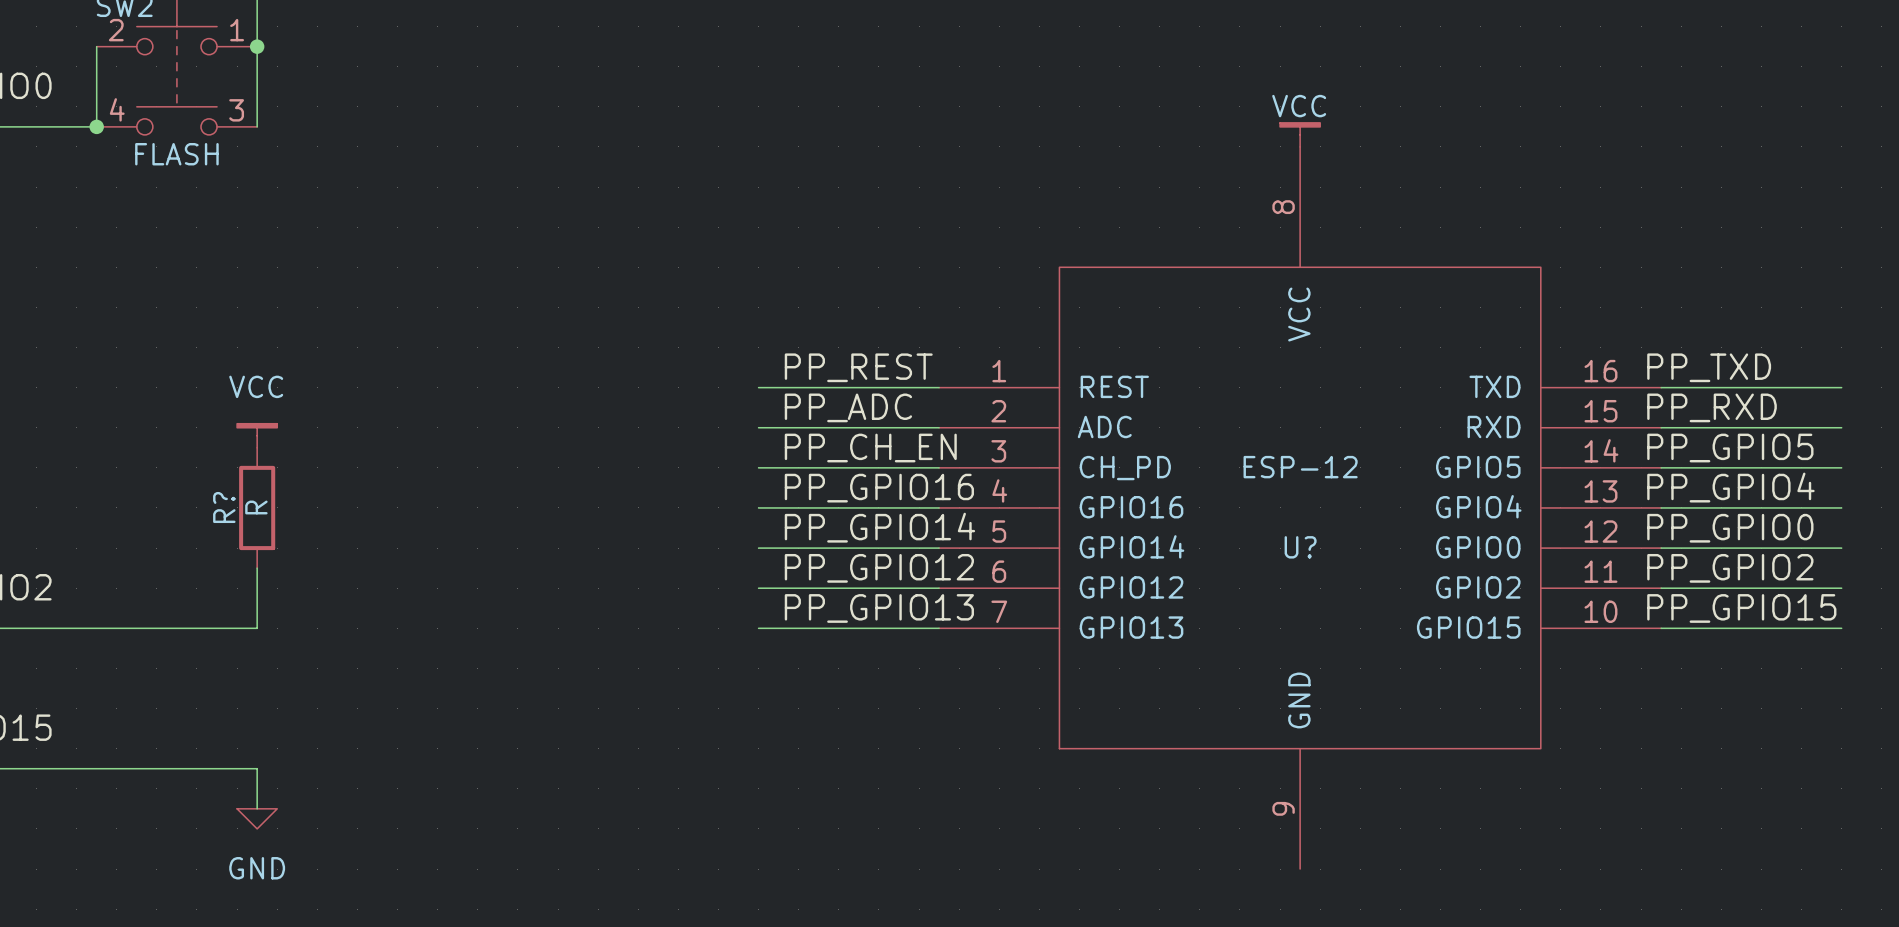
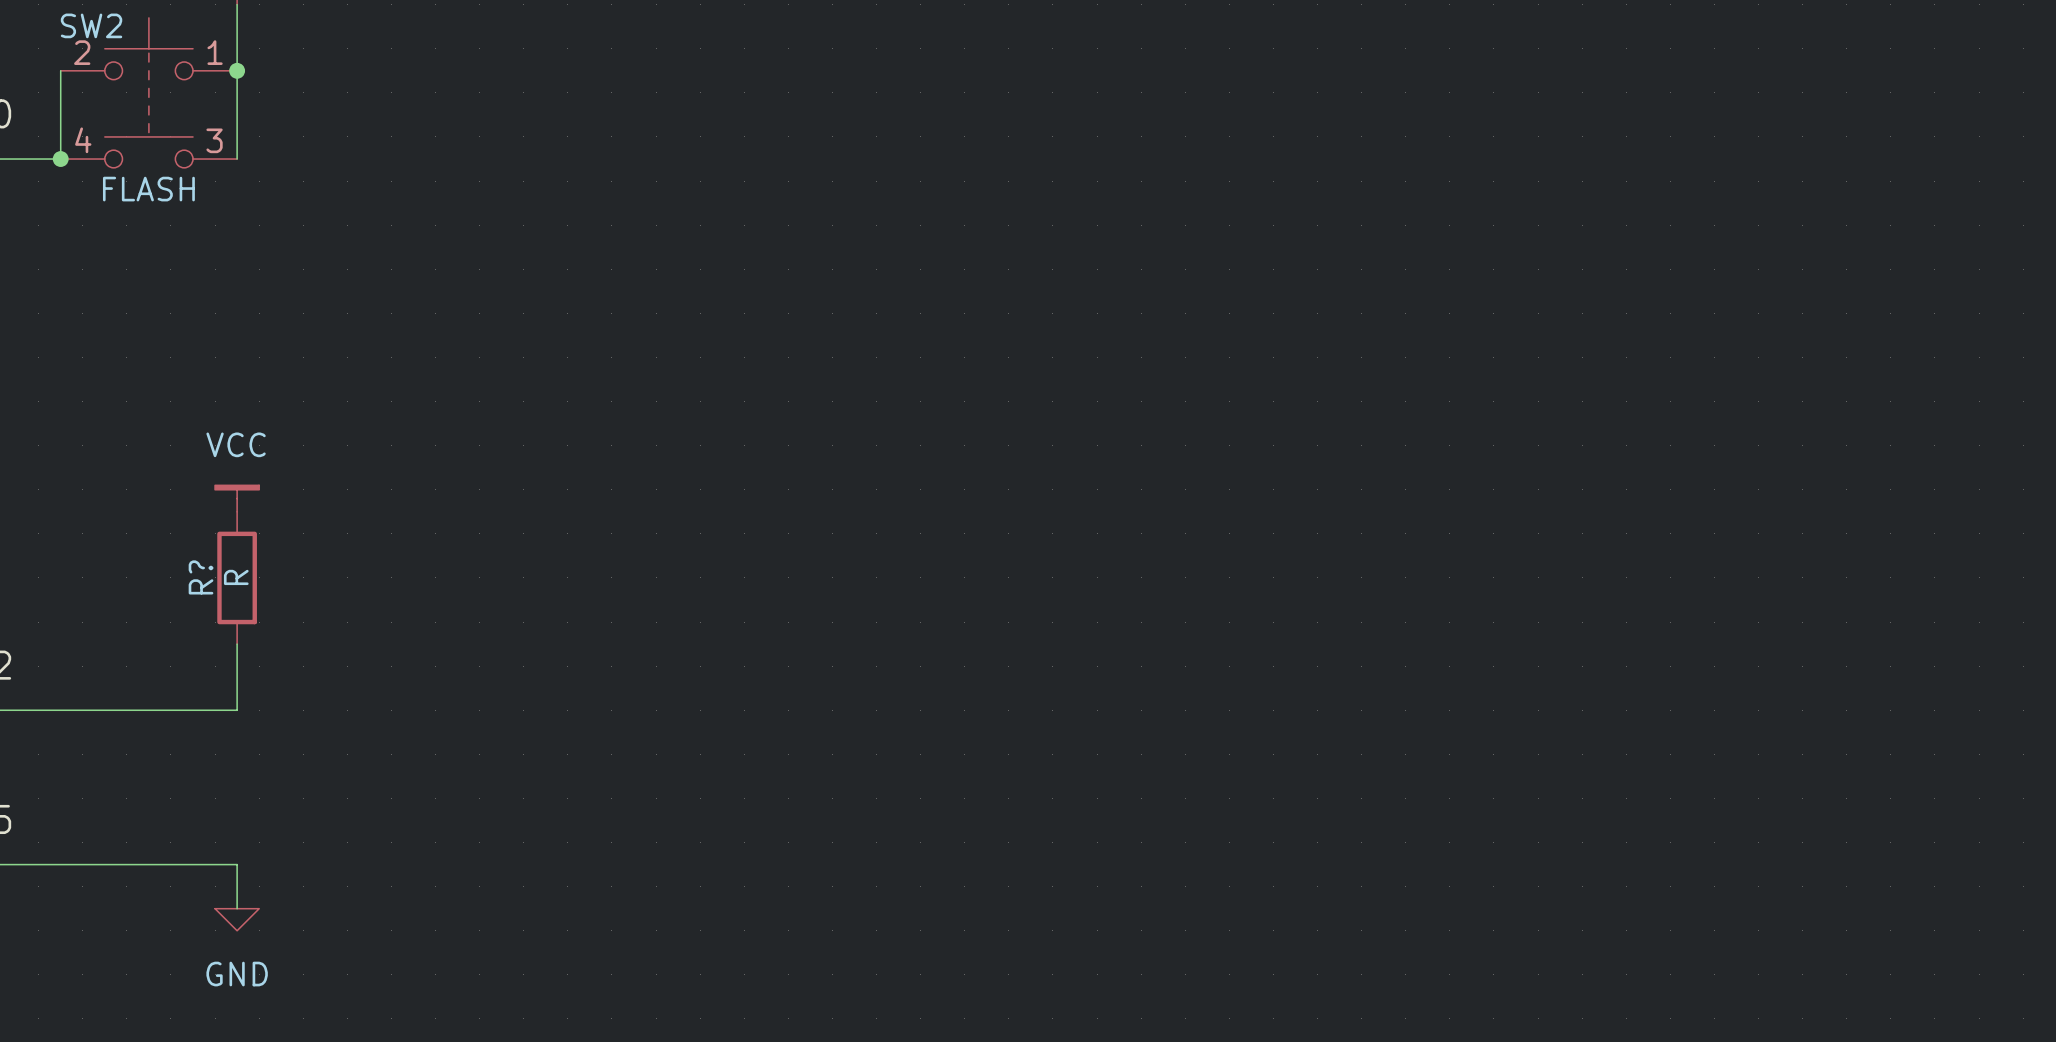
power symbol: VCC (1300, 134) -> none
label: PP_REST (858, 367) -> none
label: PP_TXD (1709, 367) -> none
wire: (758, 387) (939, 387) -> none
wire: (1661, 387) (1841, 387) -> none
label: PP_ADC (848, 407) -> none
label: PP_RXD (1712, 407) -> none
wire: (758, 427) (939, 427) -> none
wire: (1661, 427) (1841, 427) -> none
label: PP_CH_EN (870, 448) -> none
label: PP_GPIO5 (1730, 448) -> none
wire: (758, 467) (939, 467) -> none
wire: (1661, 467) (1841, 467) -> none
label: PP_GPIO4 (1730, 487) -> none
label: PP_GPIO16 (879, 488) -> none
wire: (758, 507) (939, 507) -> none
U?: ESP-12 (1300, 507) -> none
wire: (1661, 507) (1841, 507) -> none
label: PP_GPIO14 (879, 527) -> none
label: PP_GPIO0 (1730, 528) -> none
wire: (758, 548) (939, 548) -> none
wire: (1661, 548) (1841, 548) -> none
label: PP_GPIO12 (879, 568) -> none
label: PP_GPIO2 (1730, 568) -> none
wire: (758, 588) (939, 588) -> none
wire: (1661, 588) (1841, 588) -> none
label: PP_GPIO13 (879, 608) -> none
label: PP_GPIO15 (1741, 608) -> none
wire: (758, 628) (939, 628) -> none
wire: (1661, 628) (1841, 628) -> none

